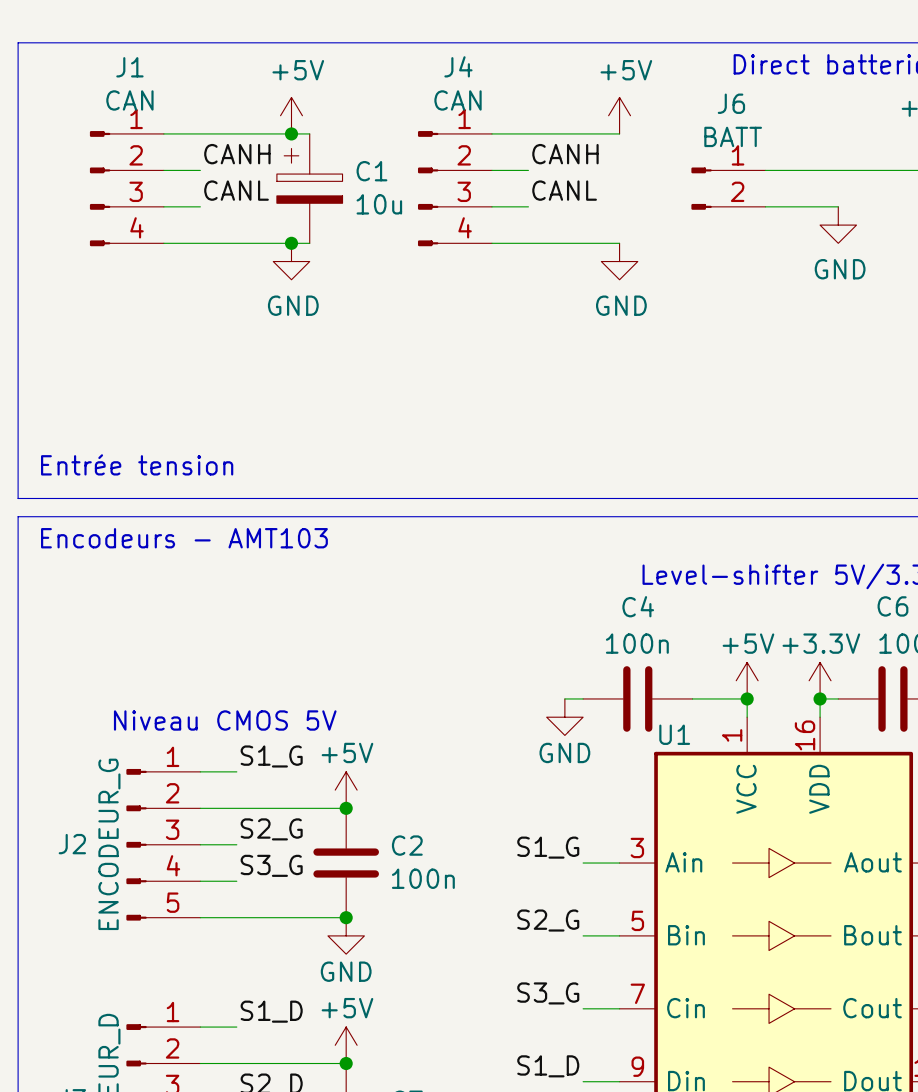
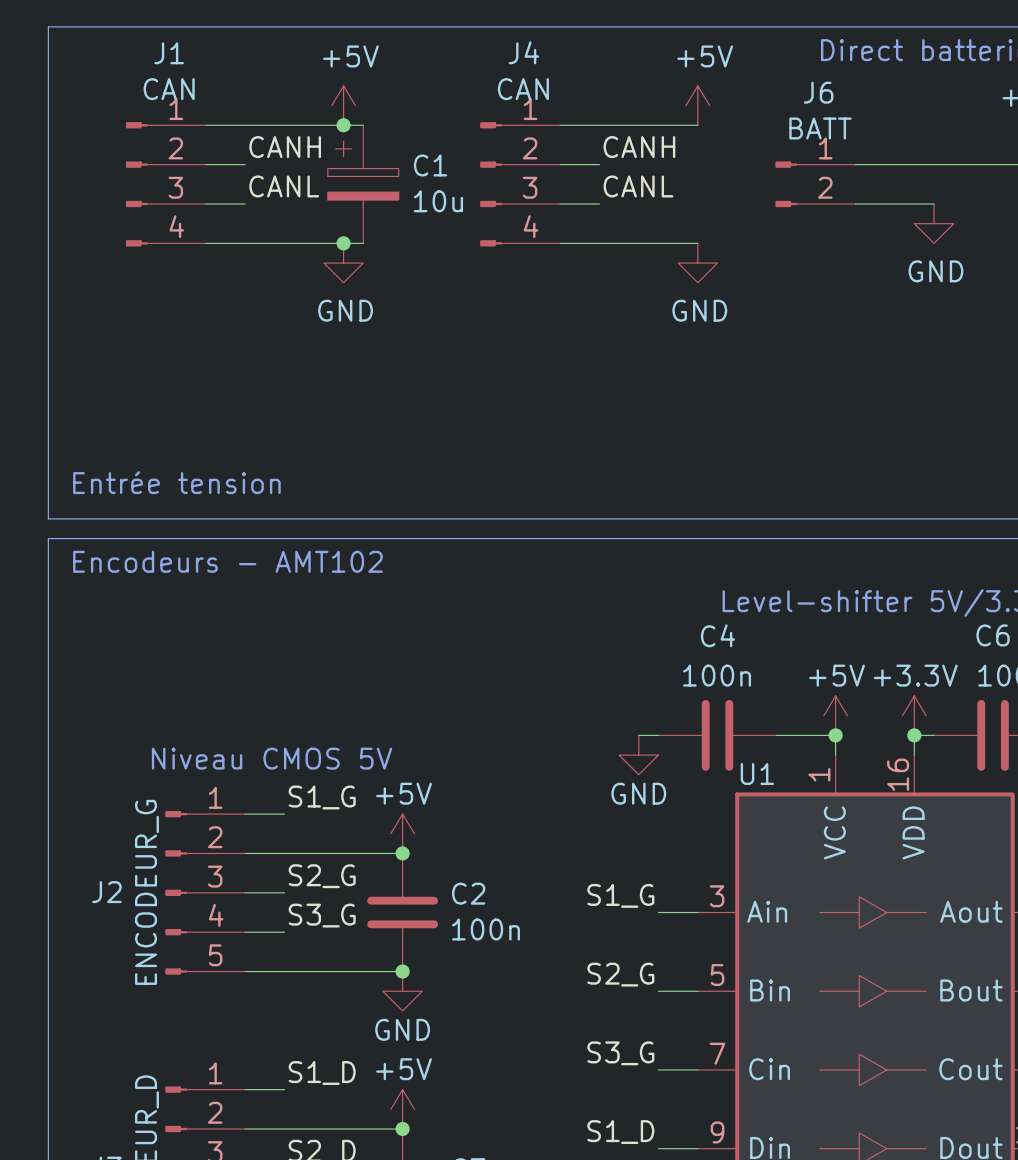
text: Encodeurs - AMT103 (184, 538) -> Encodeurs - AMT102 (227, 561)

